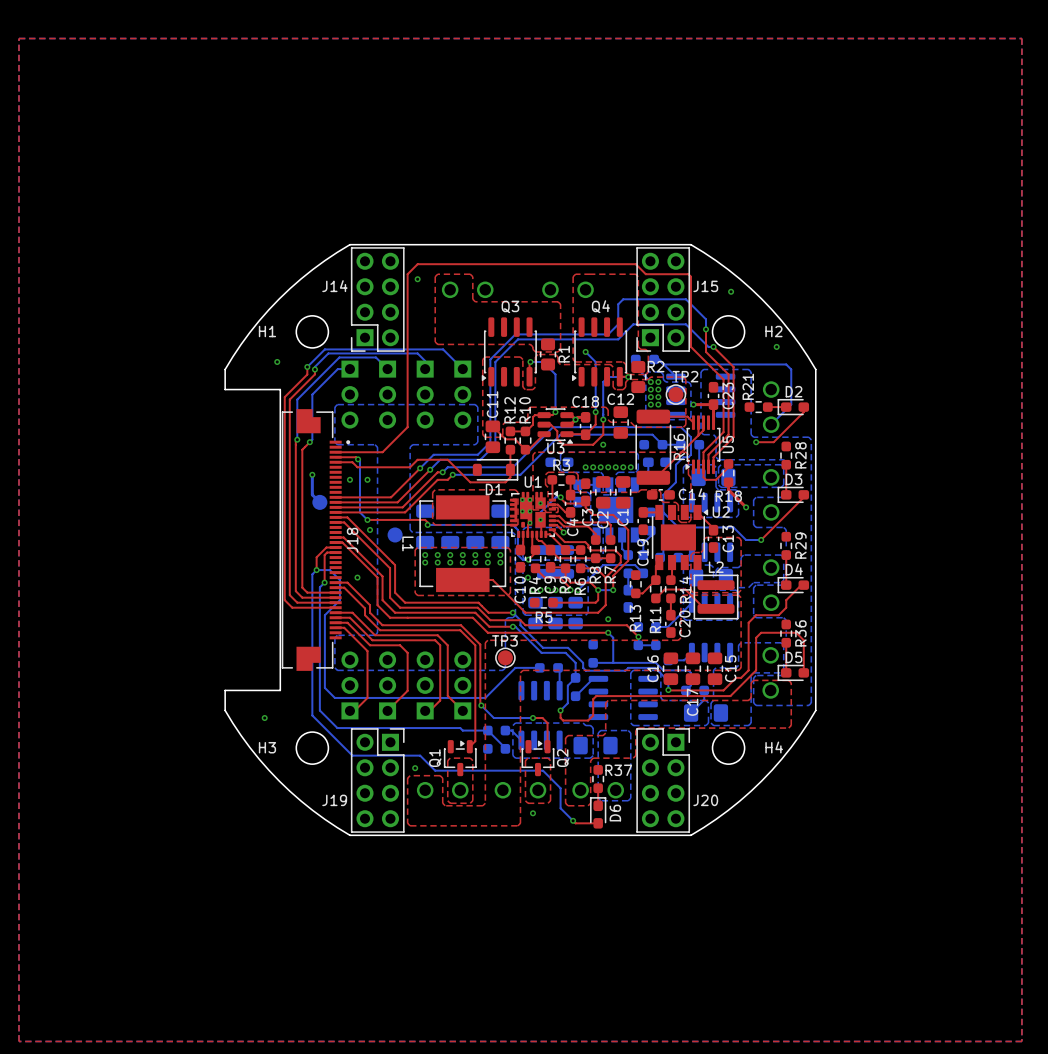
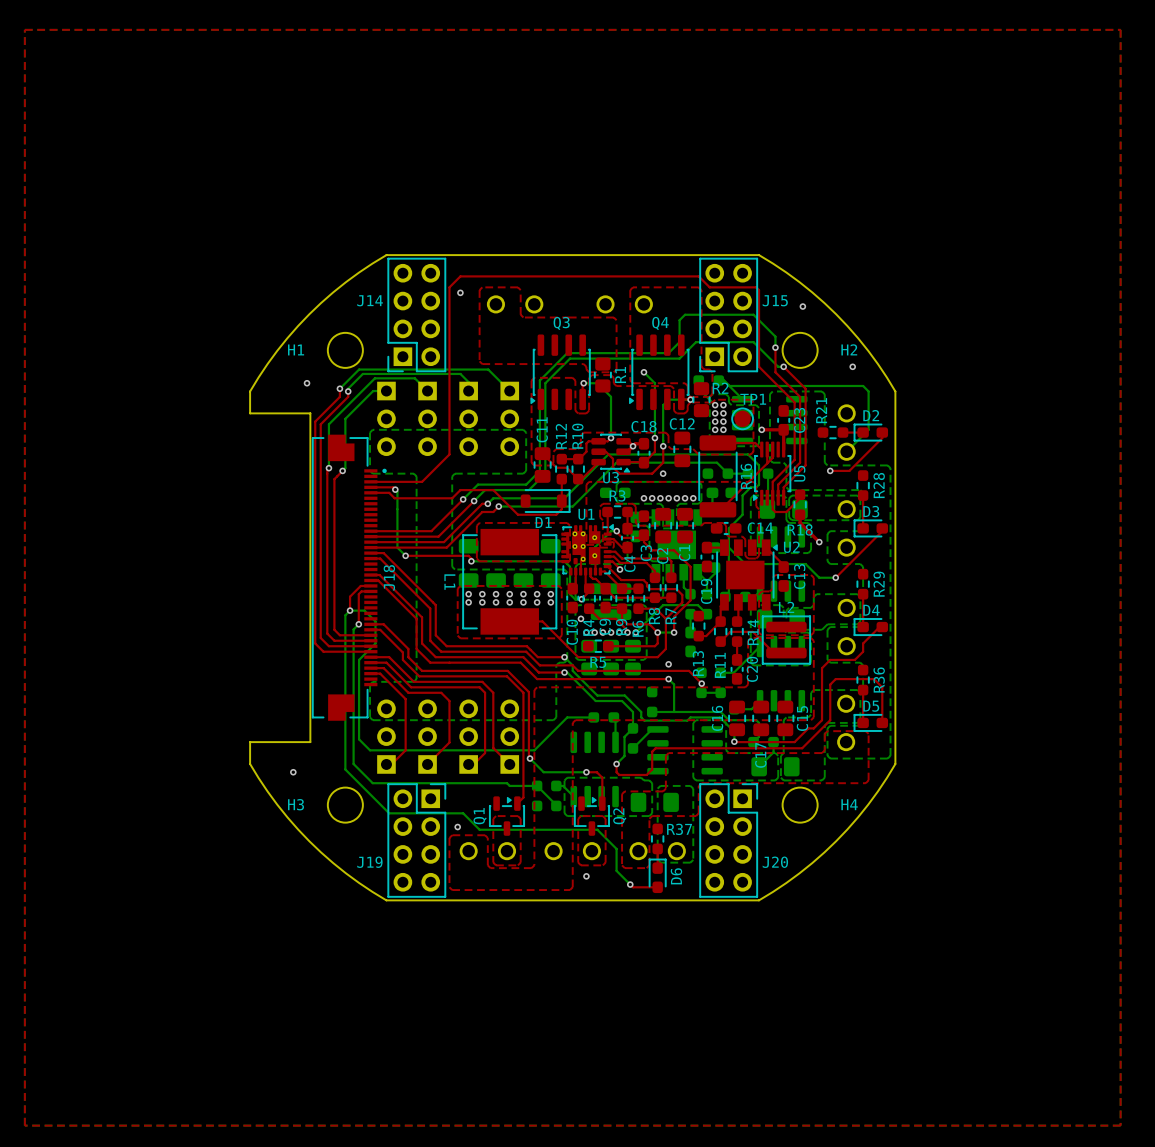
TP2 name: TP2 (685, 376) -> TP1 (753, 399)
bottom track: (312, 474) (312, 494) (319, 502) -> none
via: (312, 474) -> none
via: (349, 479) -> none
via: (367, 479) -> none
part: (319, 502) -> none
via: (370, 529) -> none
part: (395, 534) -> none
via: (357, 577) -> none
TP3: (505, 657) -> none

